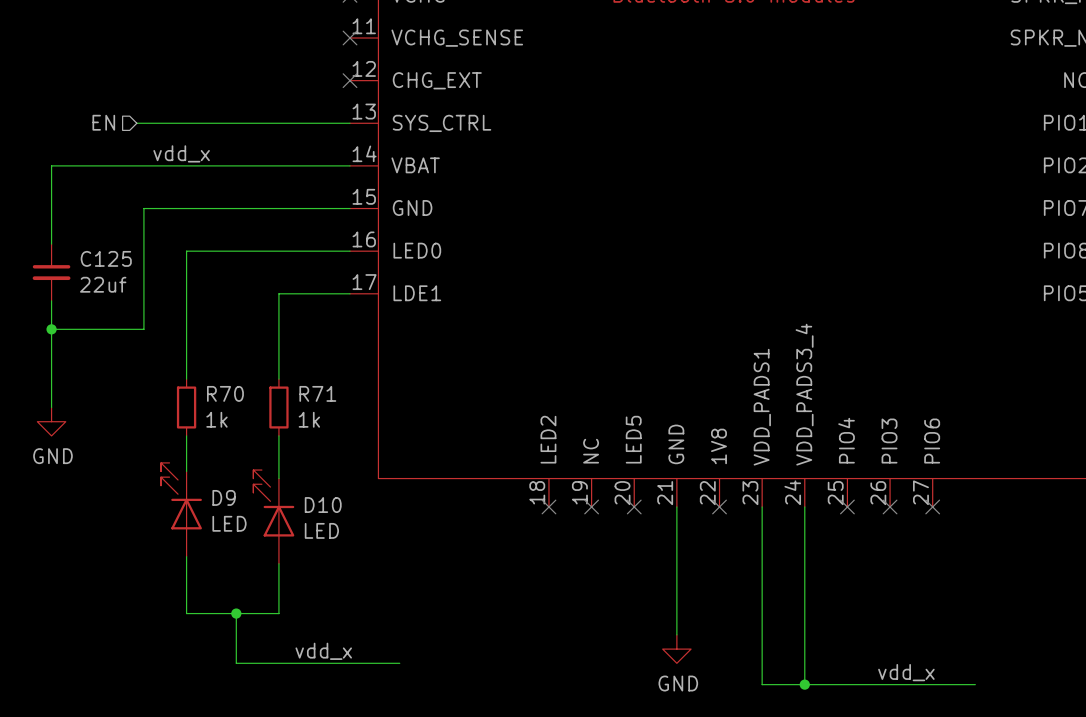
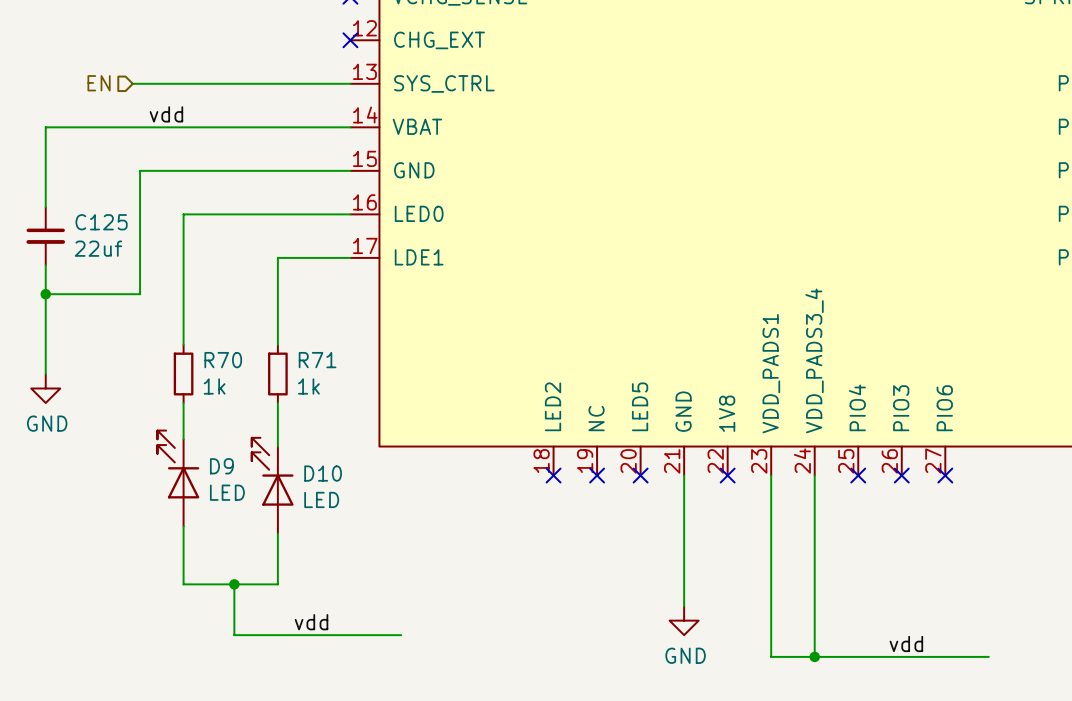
label: vdd_x (181, 153) -> vdd (166, 114)
label: vdd_x (323, 651) -> vdd (311, 622)
label: vdd_x (906, 672) -> vdd (906, 643)

